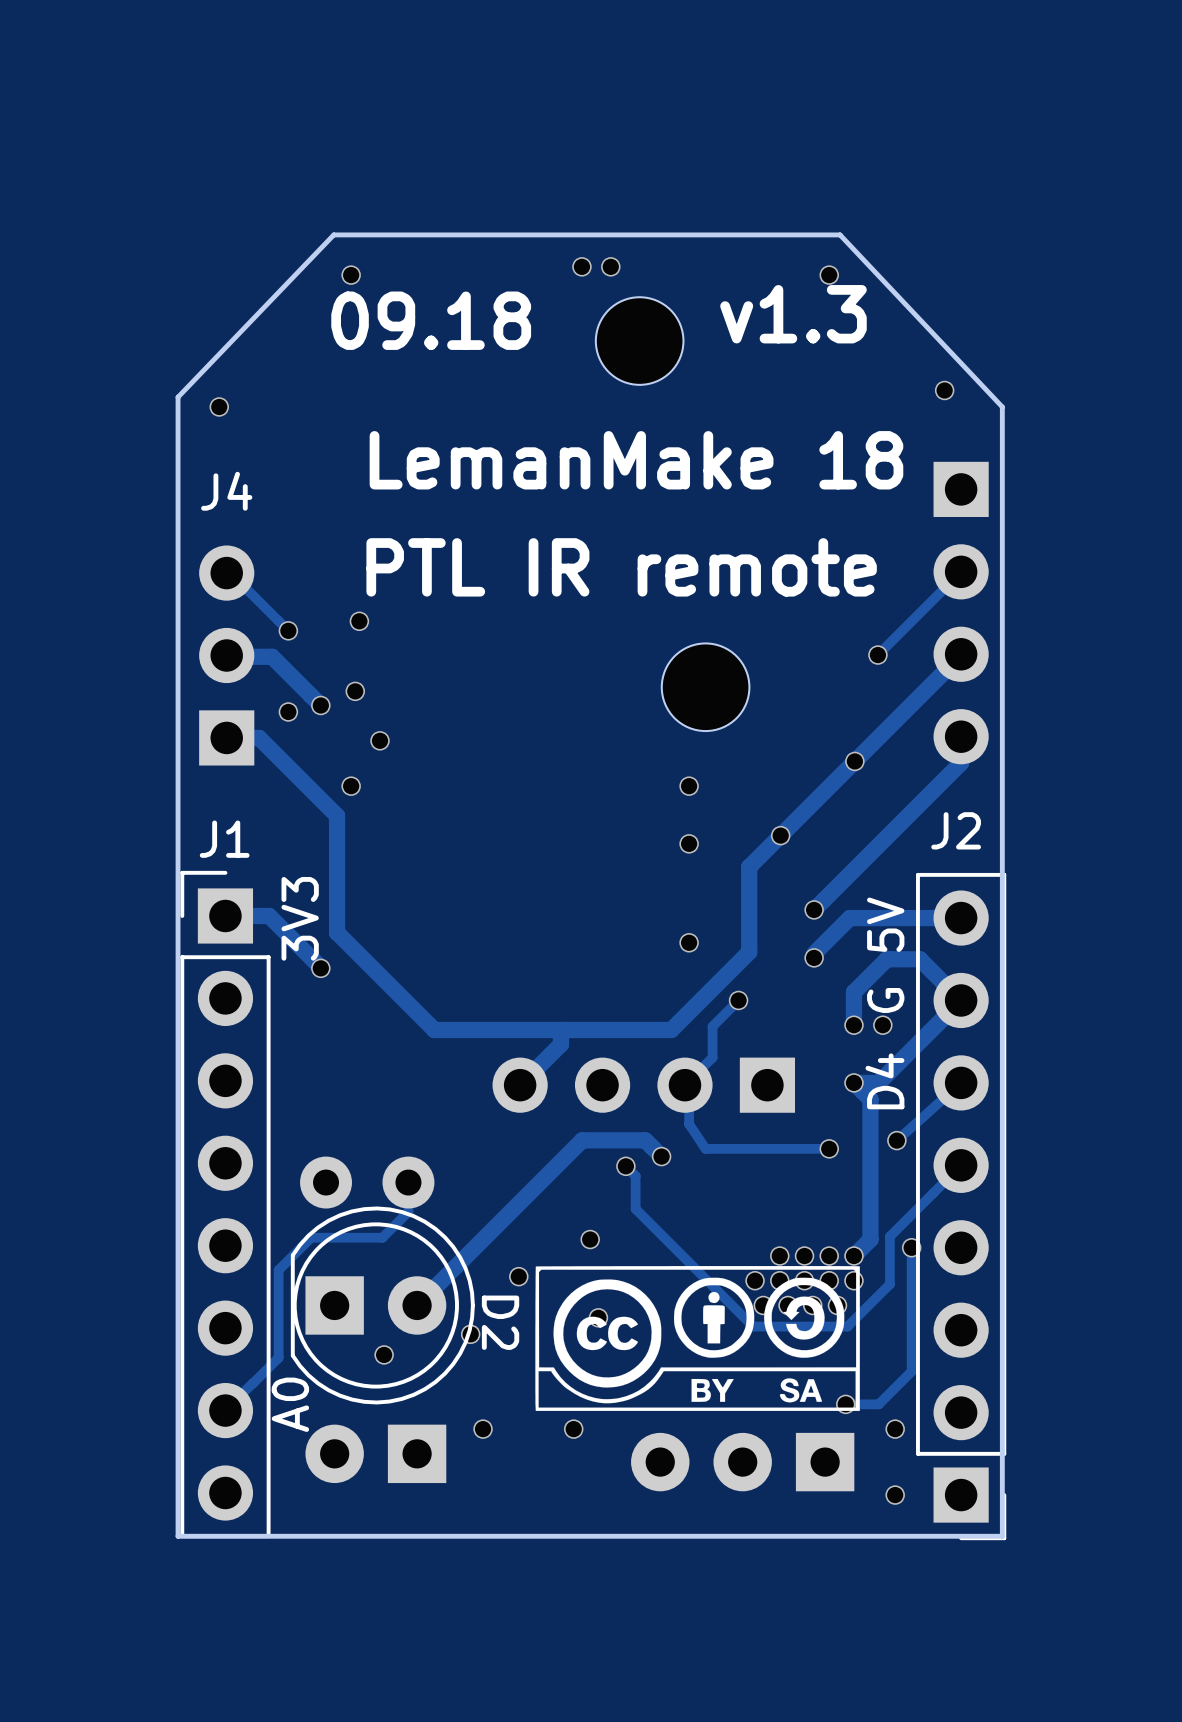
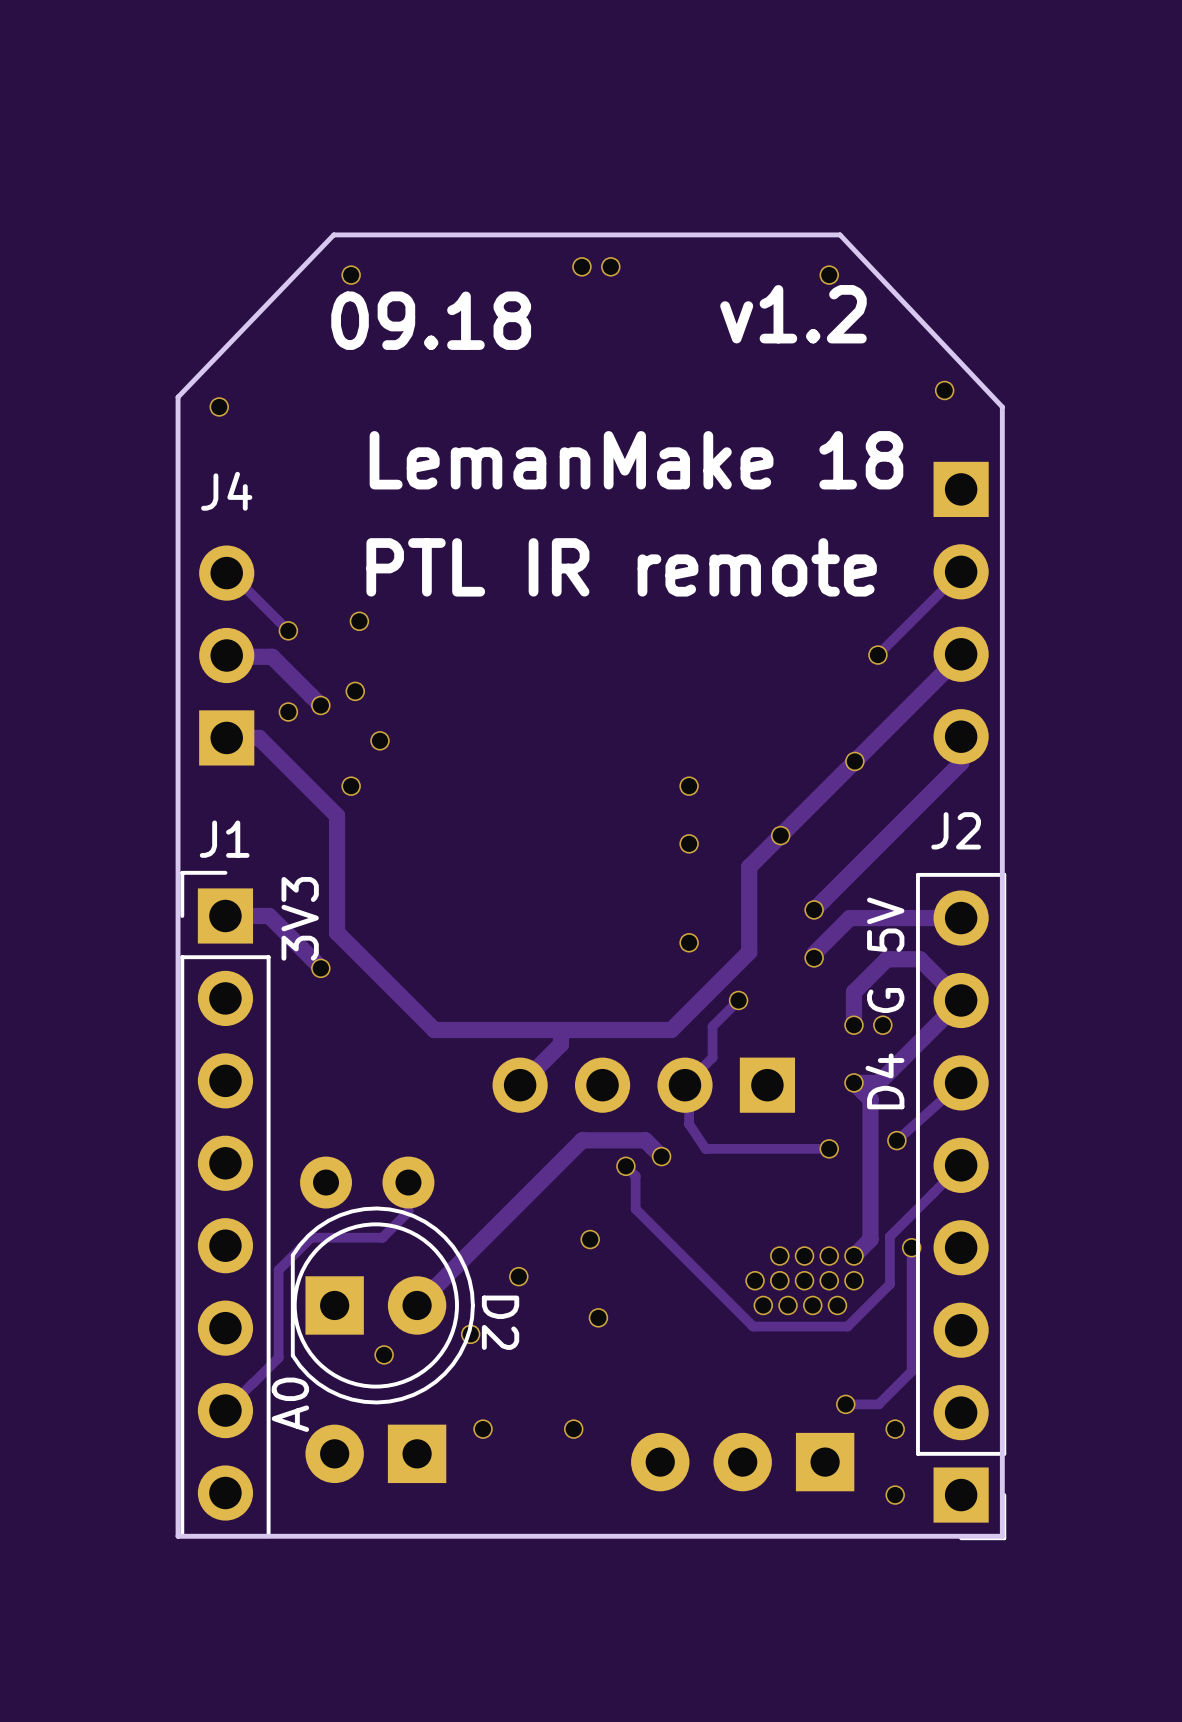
text: v1.3 (793, 314) -> v1.2 (793, 314)
part: (639, 341) -> none
part: (705, 687) -> none
drawing: [535, 1266, 860, 1411] -> none

